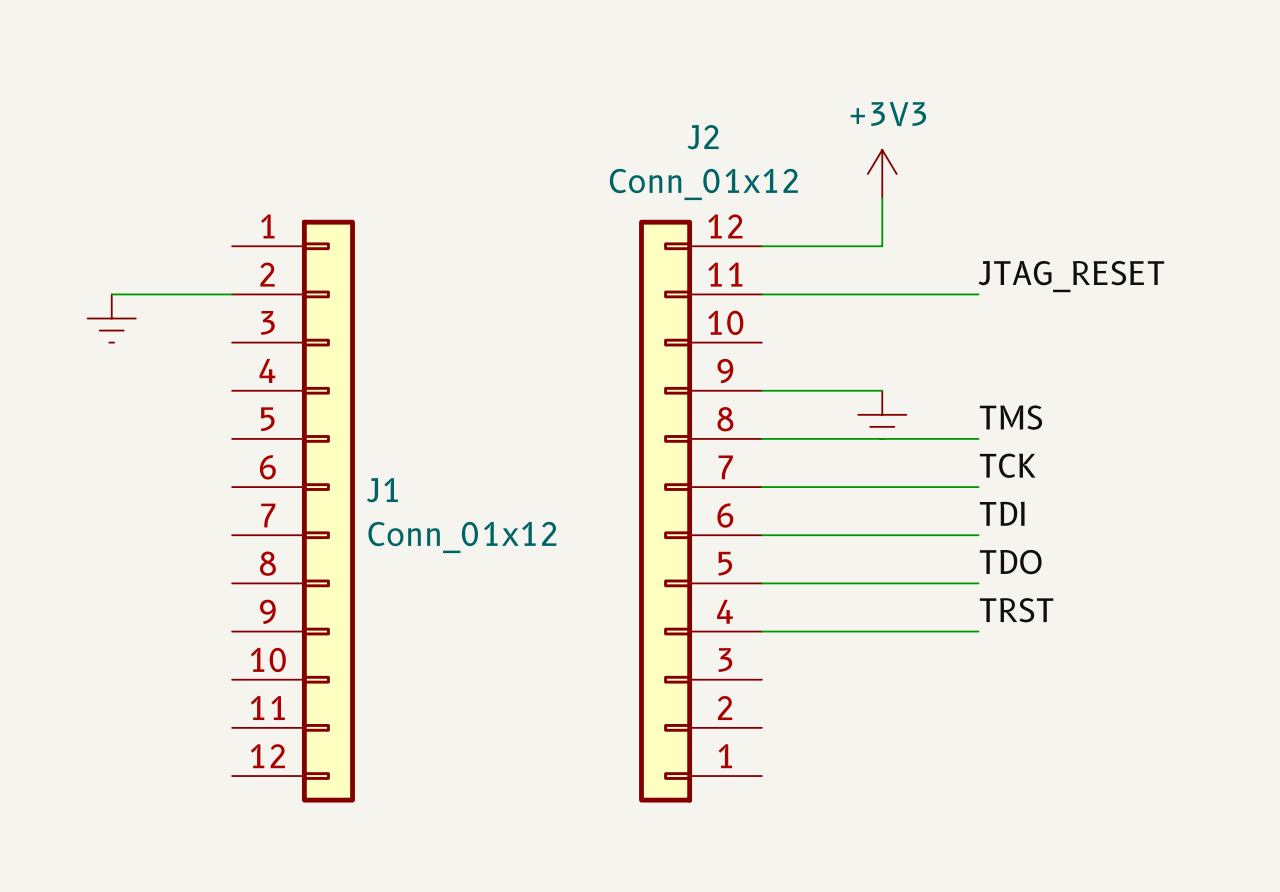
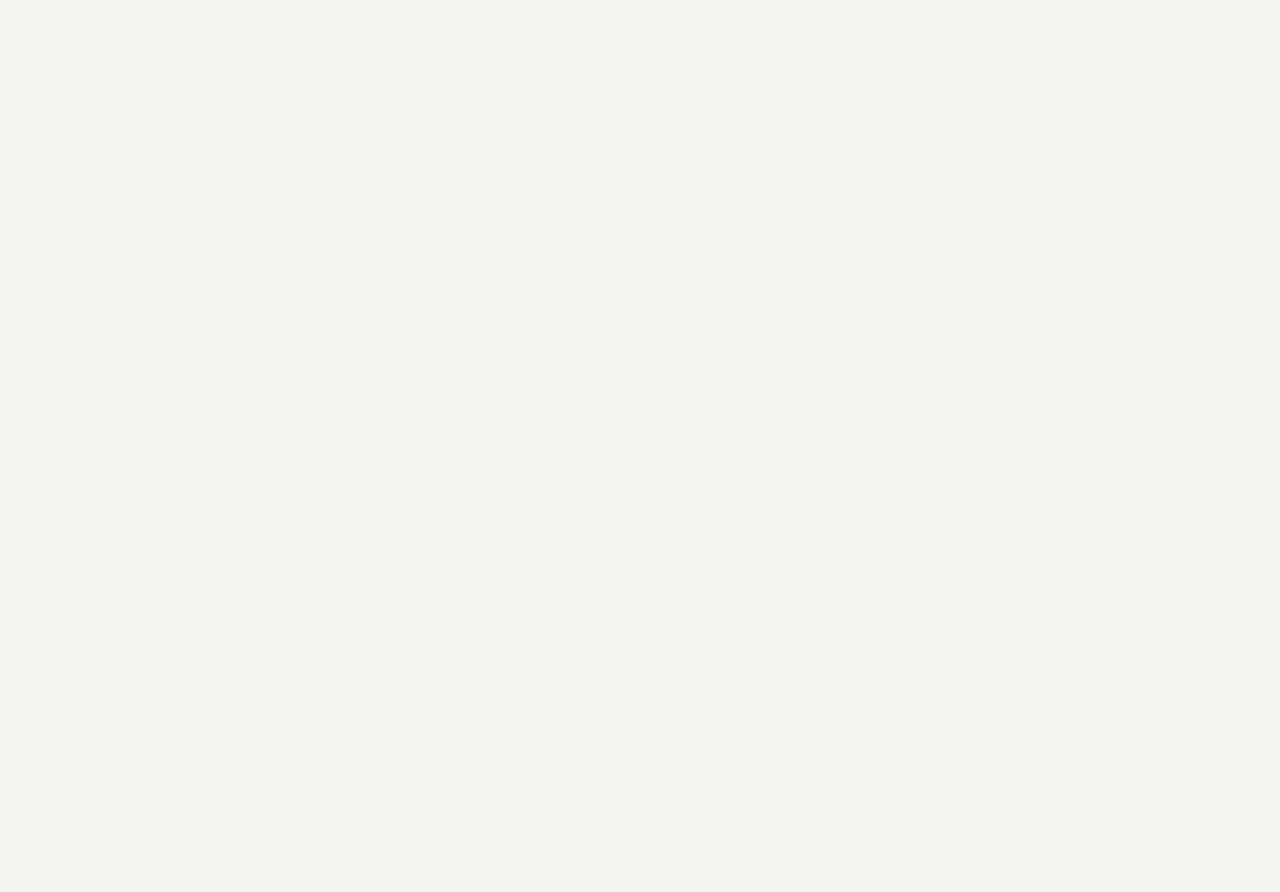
power symbol: +3V3 (882, 174) -> none
wire: (882, 198) (882, 246) (761, 246) -> none
label: JTAG_RESET (1071, 276) -> none
wire: (111, 294) (232, 294) -> none
wire: (761, 294) (978, 294) -> none
power symbol: (111, 318) -> none
wire: (761, 390) (882, 390) -> none
power symbol: (882, 414) -> none
label: TMS (1010, 417) -> none
wire: (761, 438) (978, 438) -> none
label: TCK (1007, 465) -> none
wire: (761, 487) (978, 487) -> none
J1: Conn_01x12 (293, 511) -> none
J2: Conn_01x12 (700, 511) -> none
label: TDI (1002, 513) -> none
wire: (761, 535) (978, 535) -> none
label: TDO (1010, 562) -> none
wire: (761, 583) (978, 583) -> none
label: TRST (1016, 610) -> none
wire: (761, 631) (978, 631) -> none

